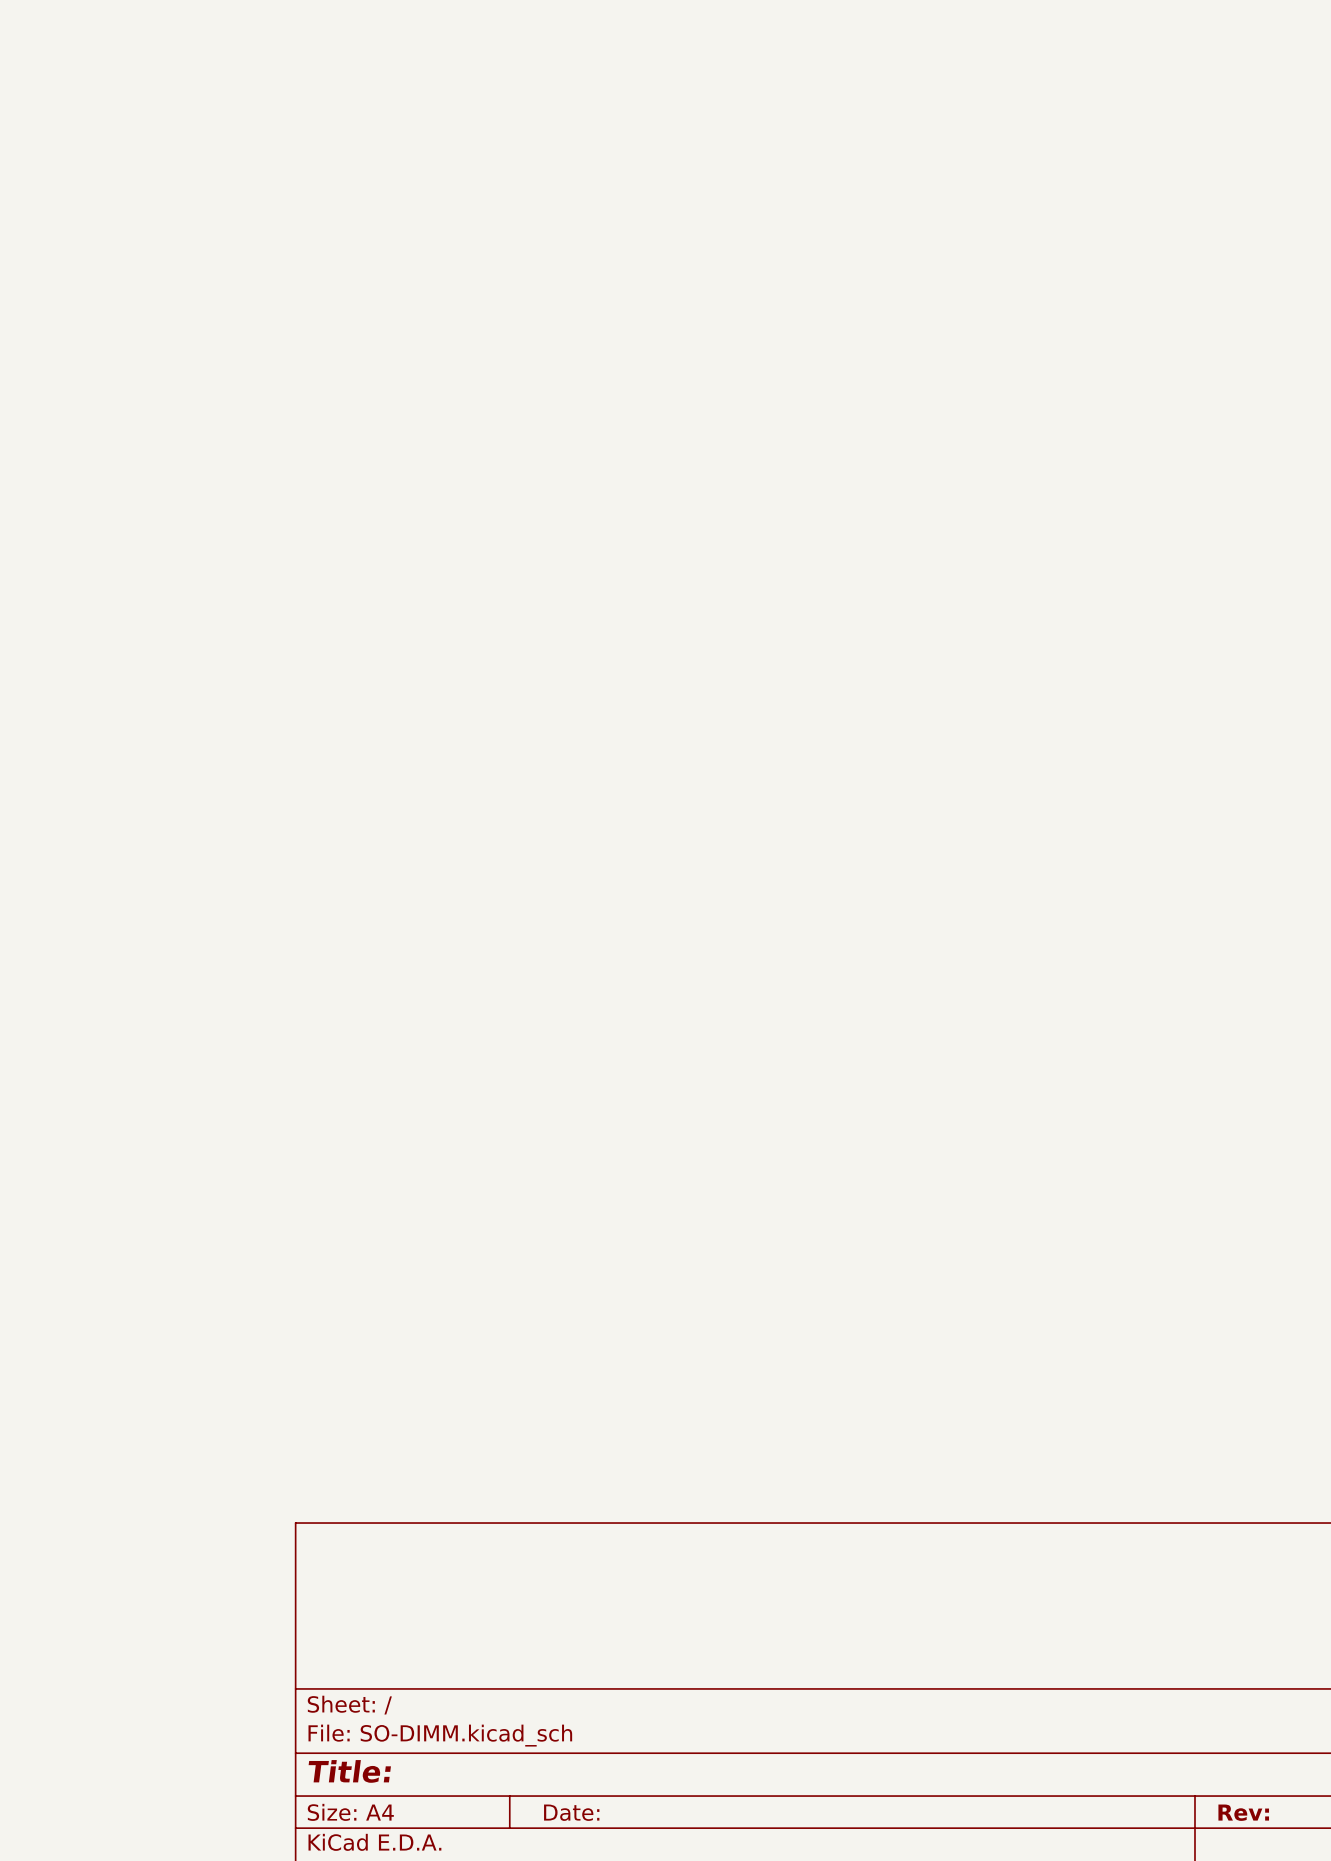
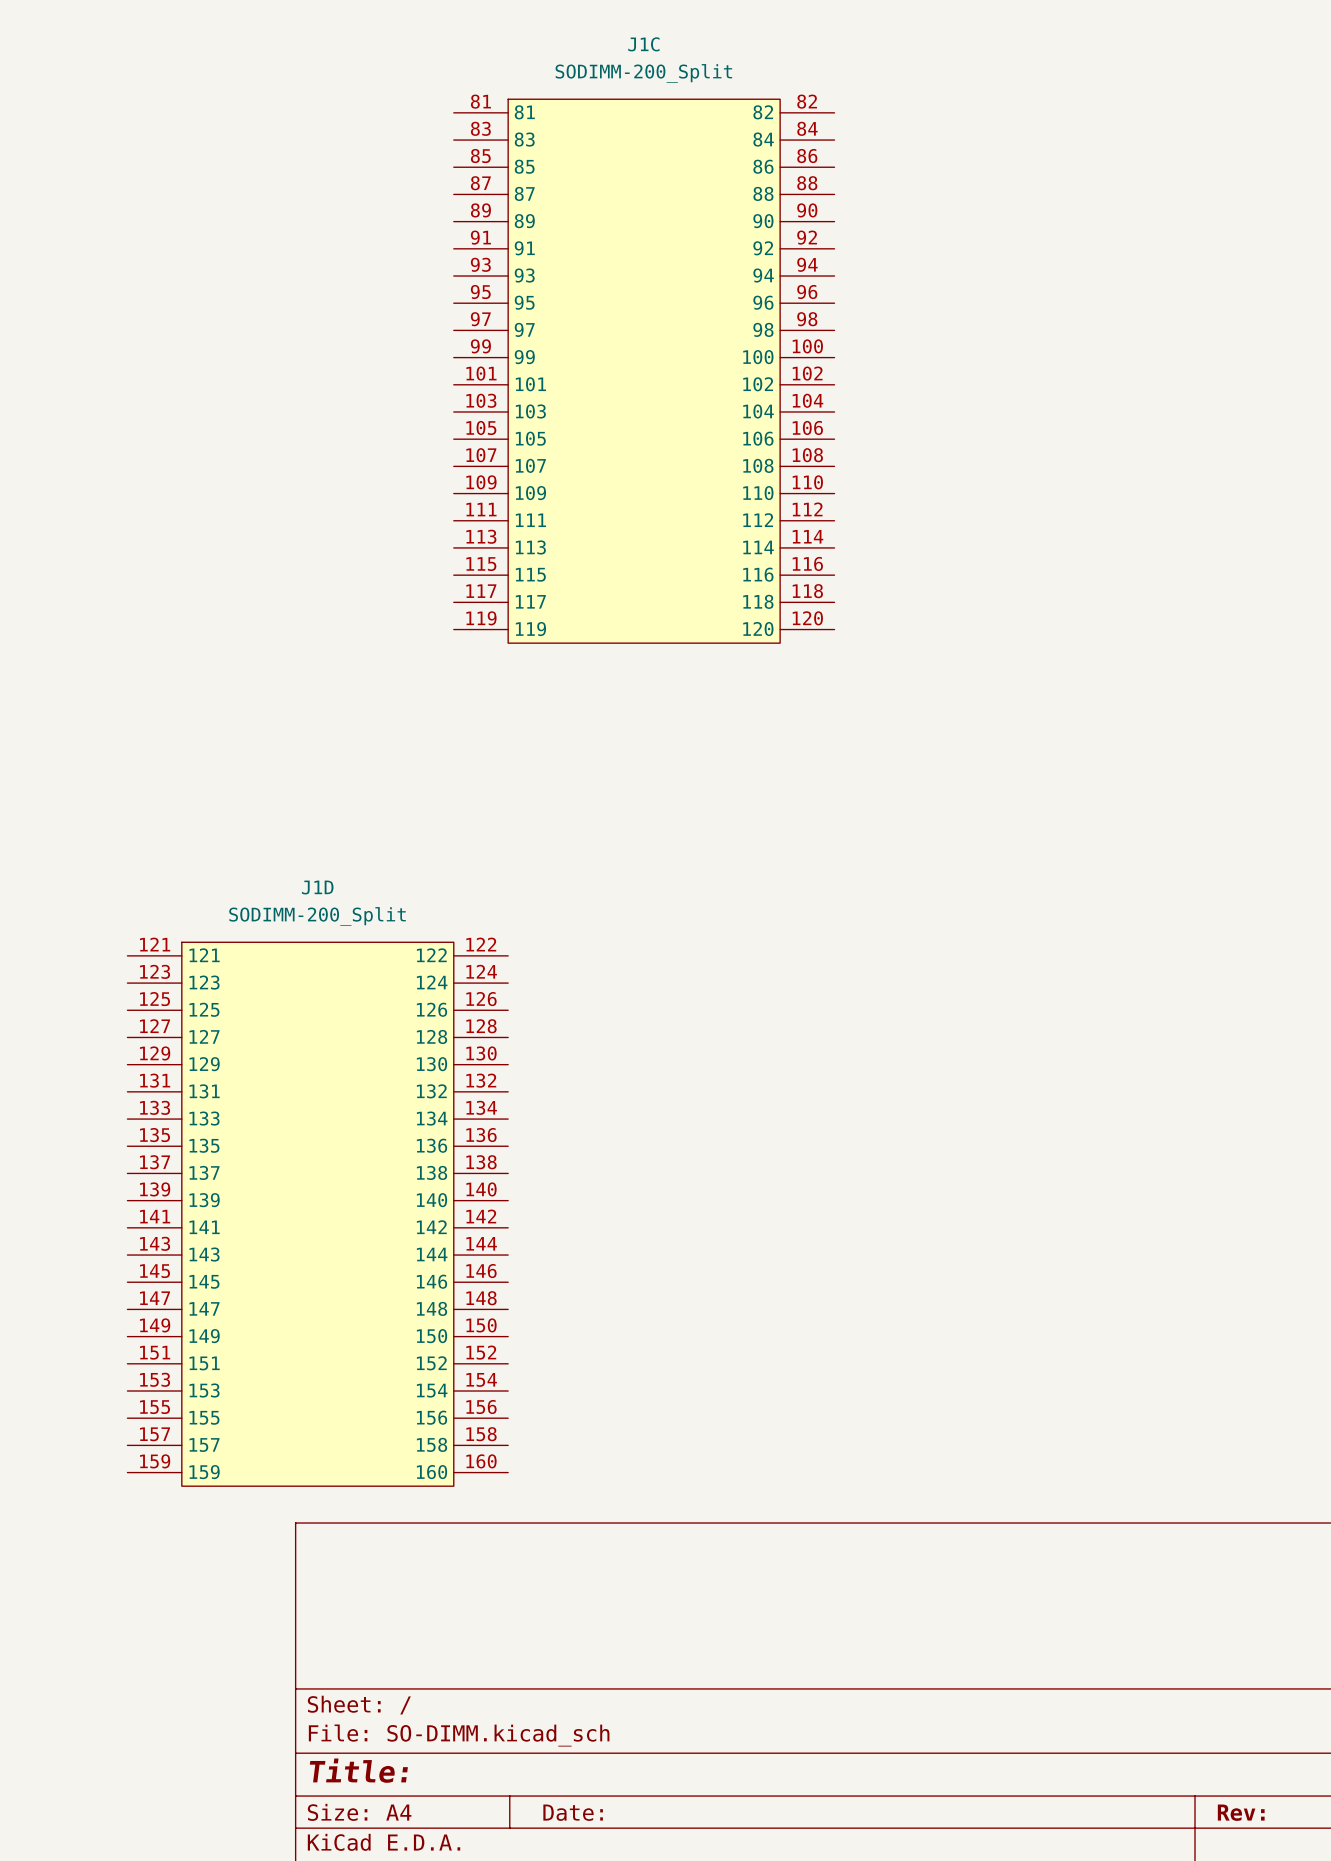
J1C: none -> SODIMM-200_Split (644, 371)
J1D: none -> SODIMM-200_Split (317, 1214)

